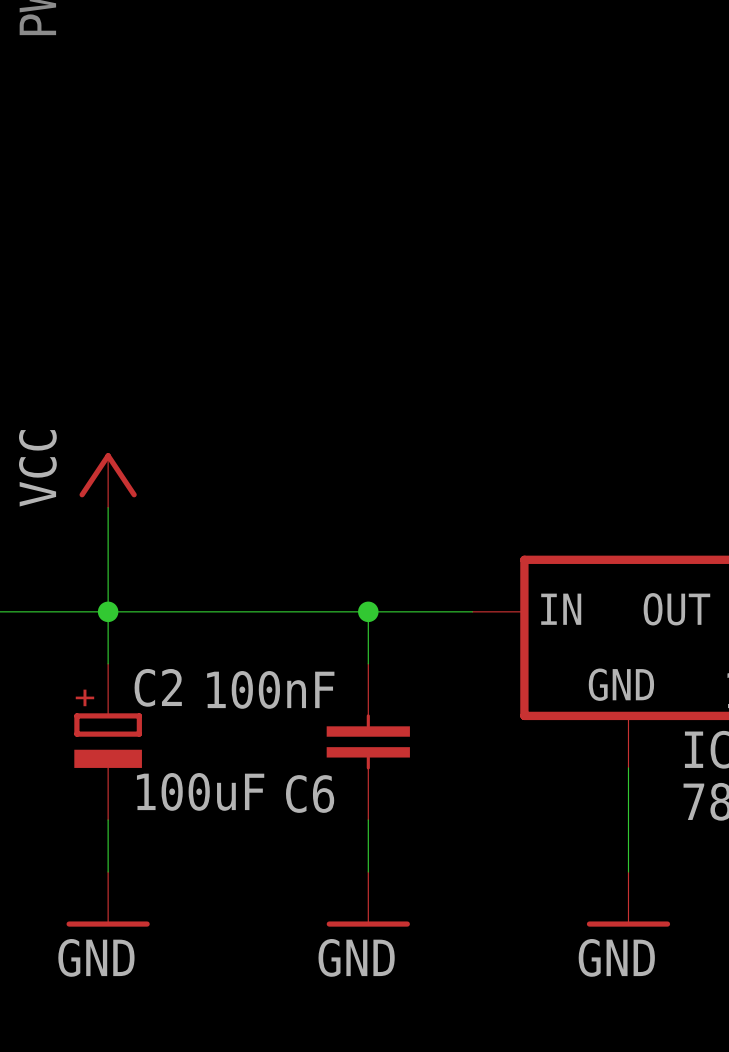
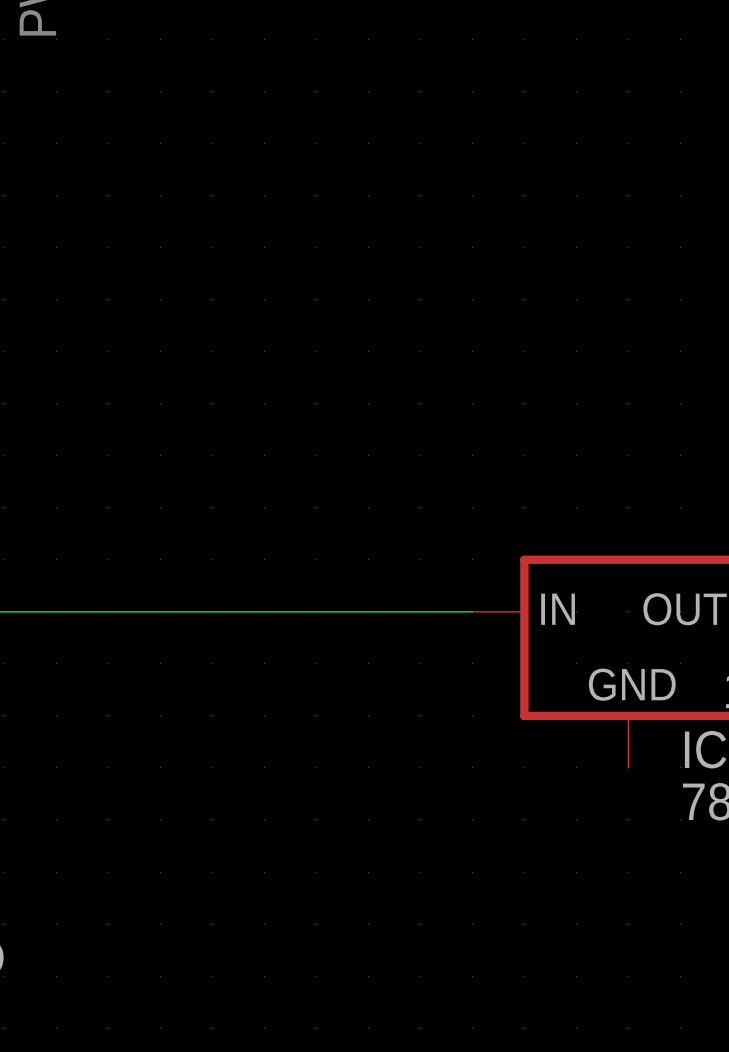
power symbol: VCC (108, 480) -> none
wire: (108, 507) (108, 663) -> none
junction: (108, 611) -> none
wire: (368, 611) (368, 663) -> none
junction: (368, 611) -> none
C2: 100uF (108, 741) -> none
C6: 100nF (368, 741) -> none
wire: (628, 767) (628, 872) -> none
wire: (108, 819) (108, 872) -> none
wire: (368, 819) (368, 872) -> none
power symbol: GND (108, 899) -> none
power symbol: GND (368, 899) -> none
power symbol: GND (628, 899) -> none

